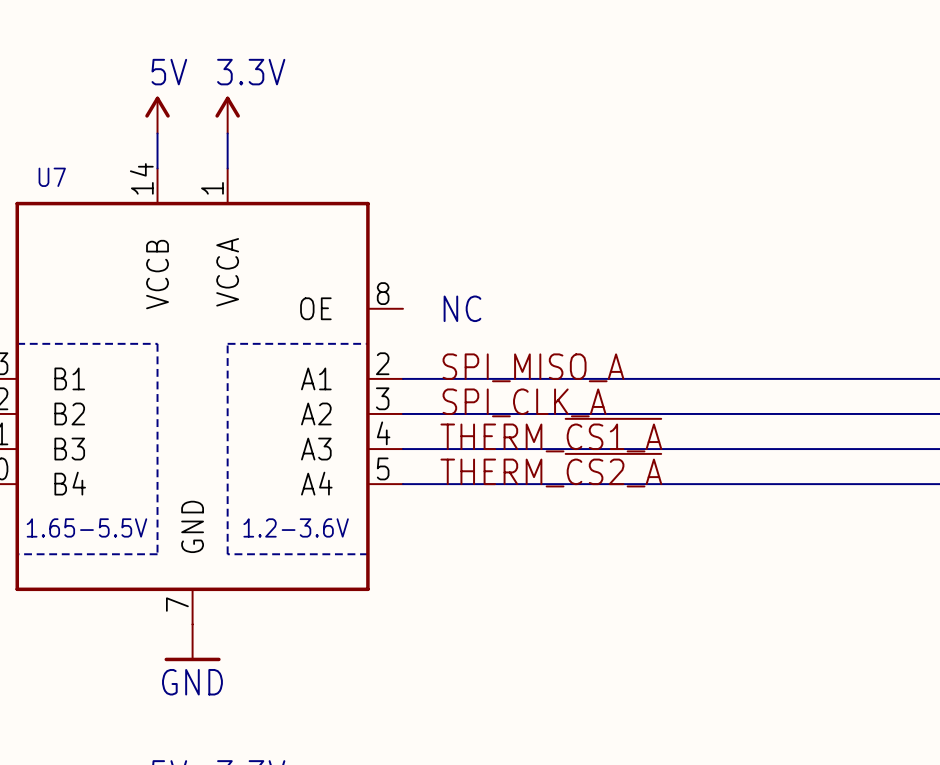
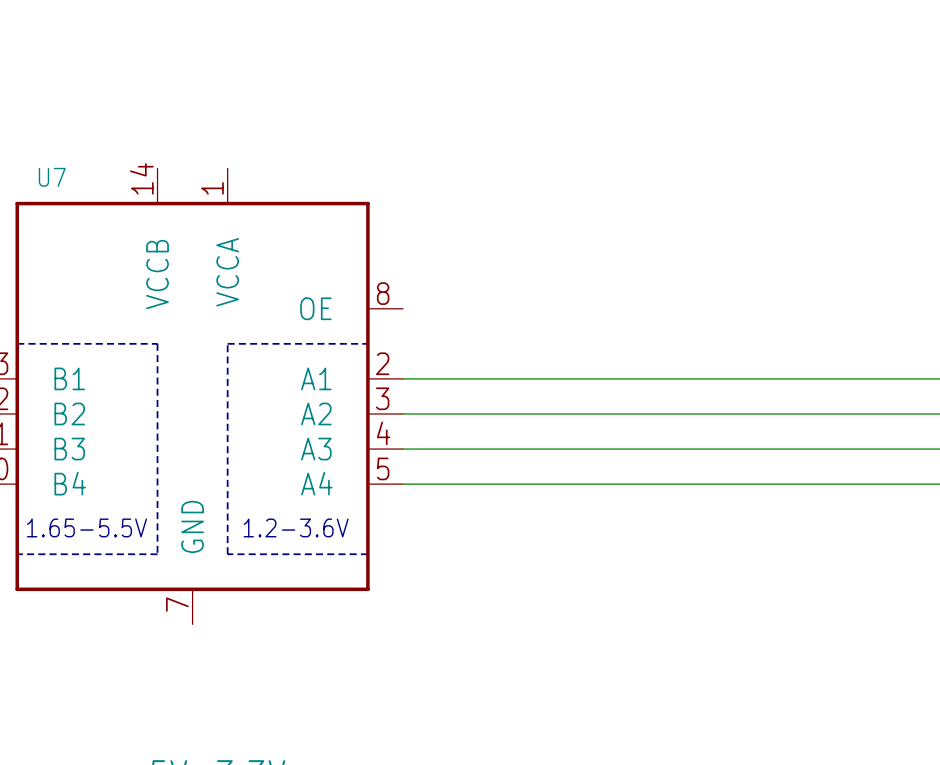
power symbol: 5V (157, 115) -> none
power symbol: 3.3V (227, 115) -> none
wire: (157, 133) (157, 168) -> none
wire: (227, 133) (227, 168) -> none
text: NC (462, 308) -> none
label: SPI_MISO_A (533, 367) -> none
label: SPI_CLK_A (524, 402) -> none
label: THERM_~{CS1_A} (551, 435) -> none
label: THERM_~{CS2_A} (551, 470) -> none
power symbol: GND (192, 642) -> none

